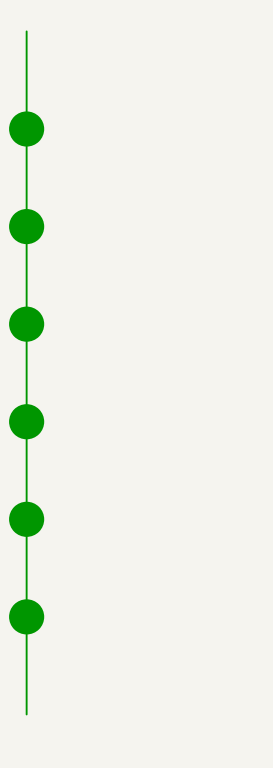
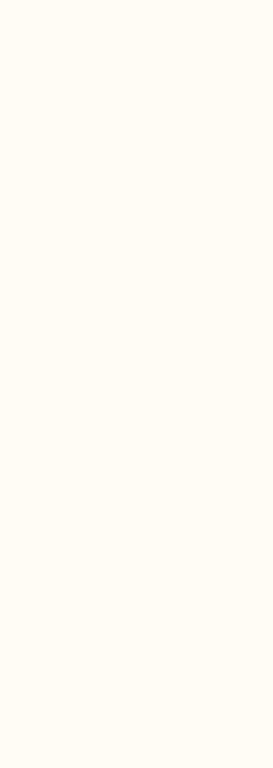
wire: (26, 31) (26, 714) -> none
junction: (26, 129) -> none
junction: (26, 226) -> none
junction: (26, 324) -> none
junction: (26, 421) -> none
junction: (26, 519) -> none
junction: (26, 616) -> none

